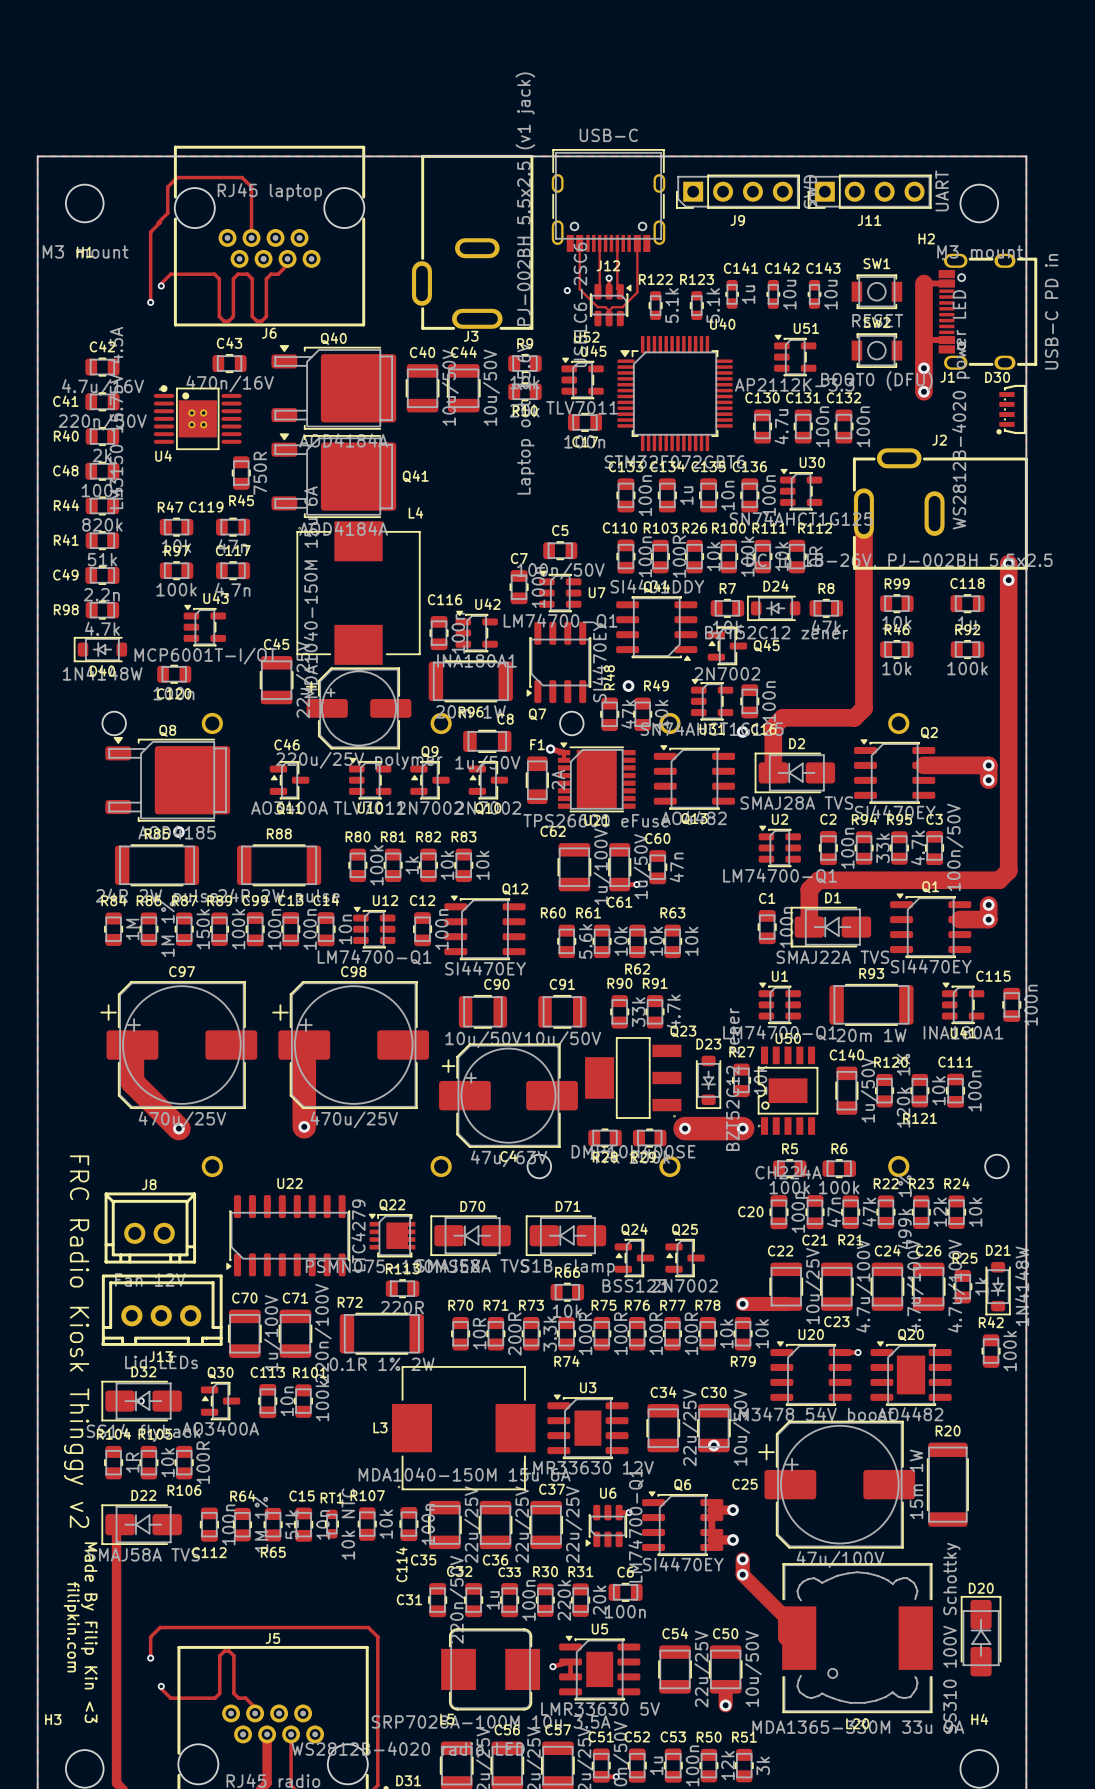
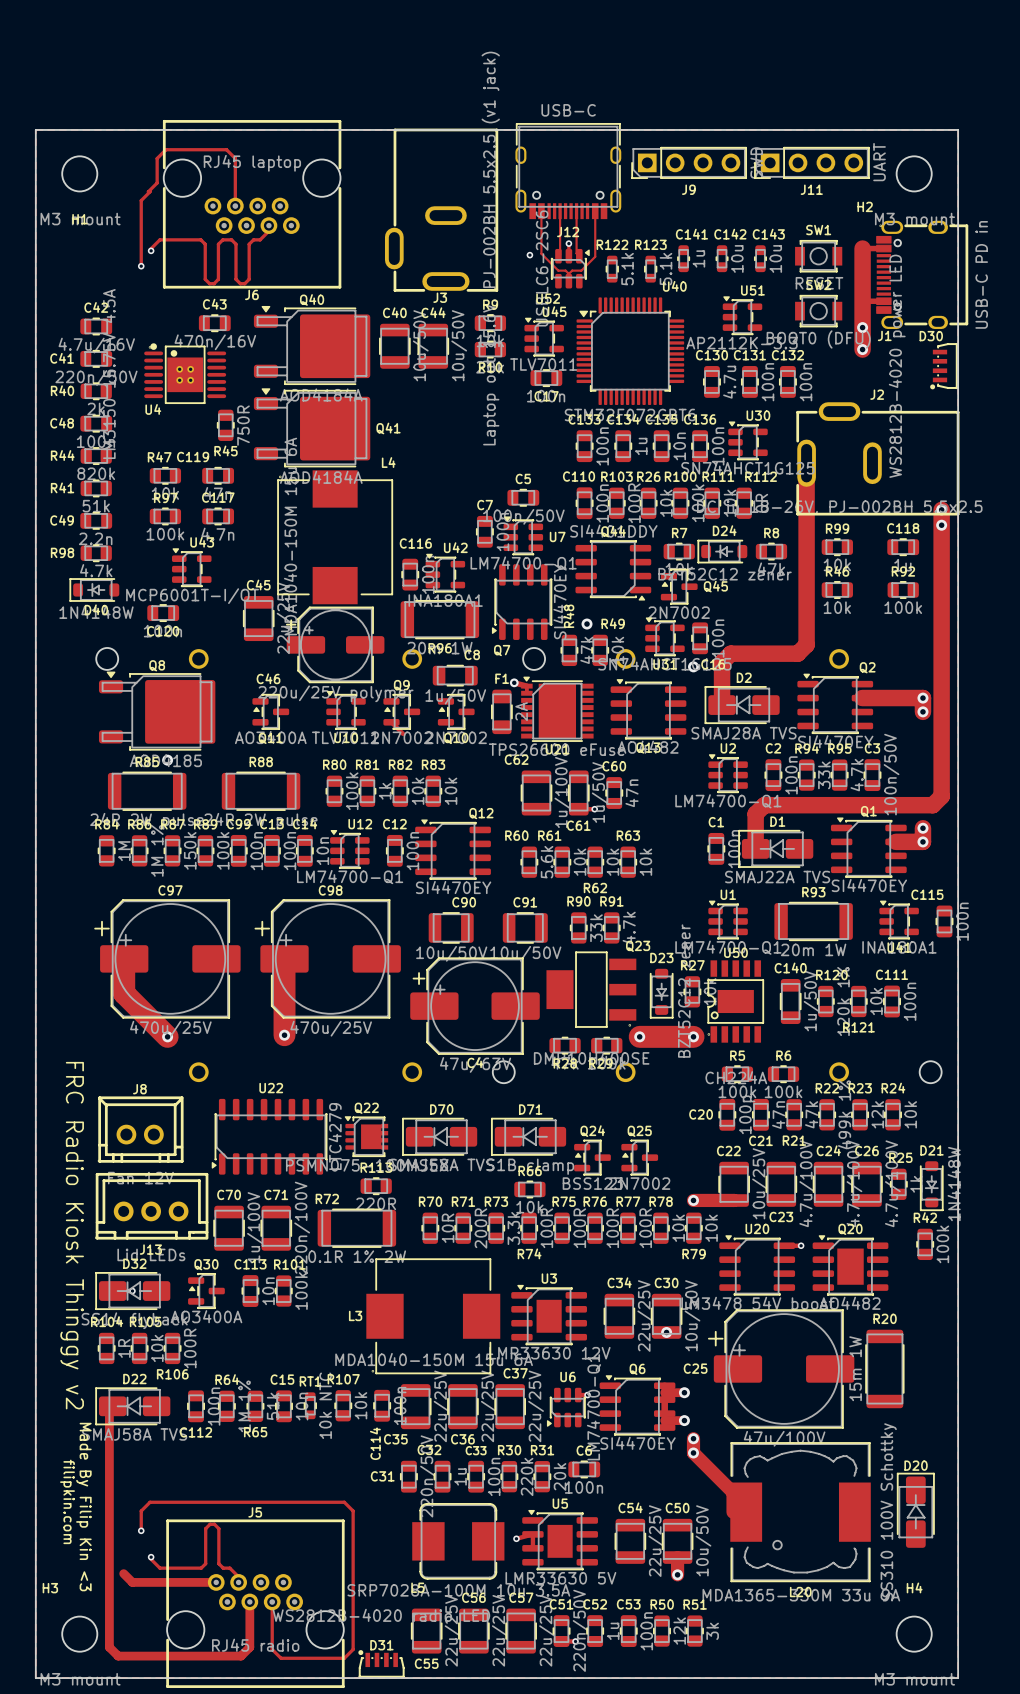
track: none -> (391, 722) (403, 733)
track: none -> (123, 1573) (132, 1582) (216, 1582)

